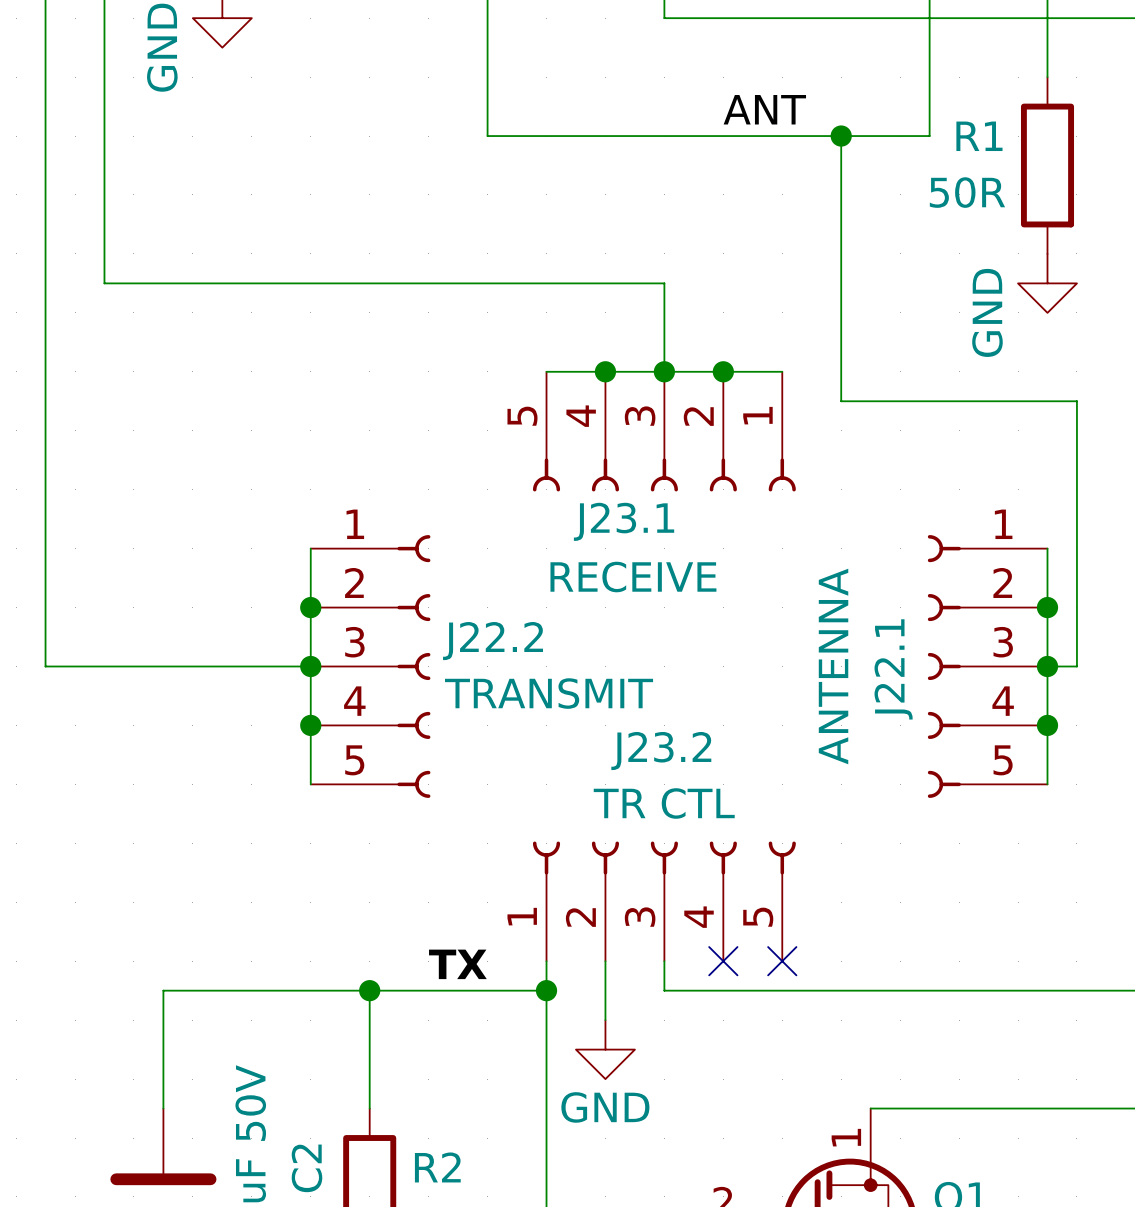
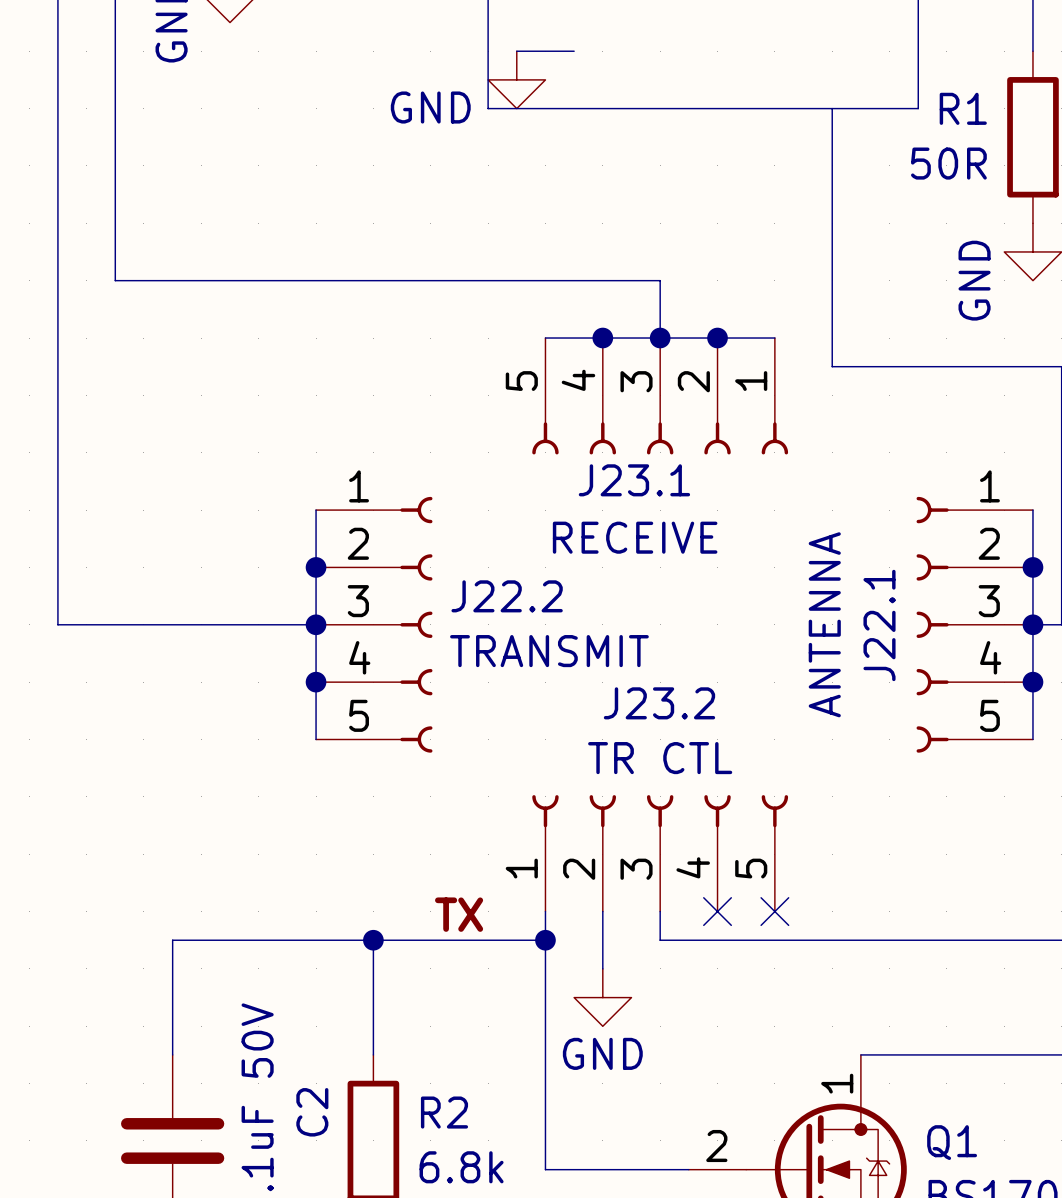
wire: none -> (516, 51) (574, 51)
power symbol: none -> GND (516, 79)
label: ANT (764, 109) -> none
junction: (841, 136) -> none
wire: (104, 283) (664, 283) (664, 312) -> (115, 251) (115, 280) (660, 280)

